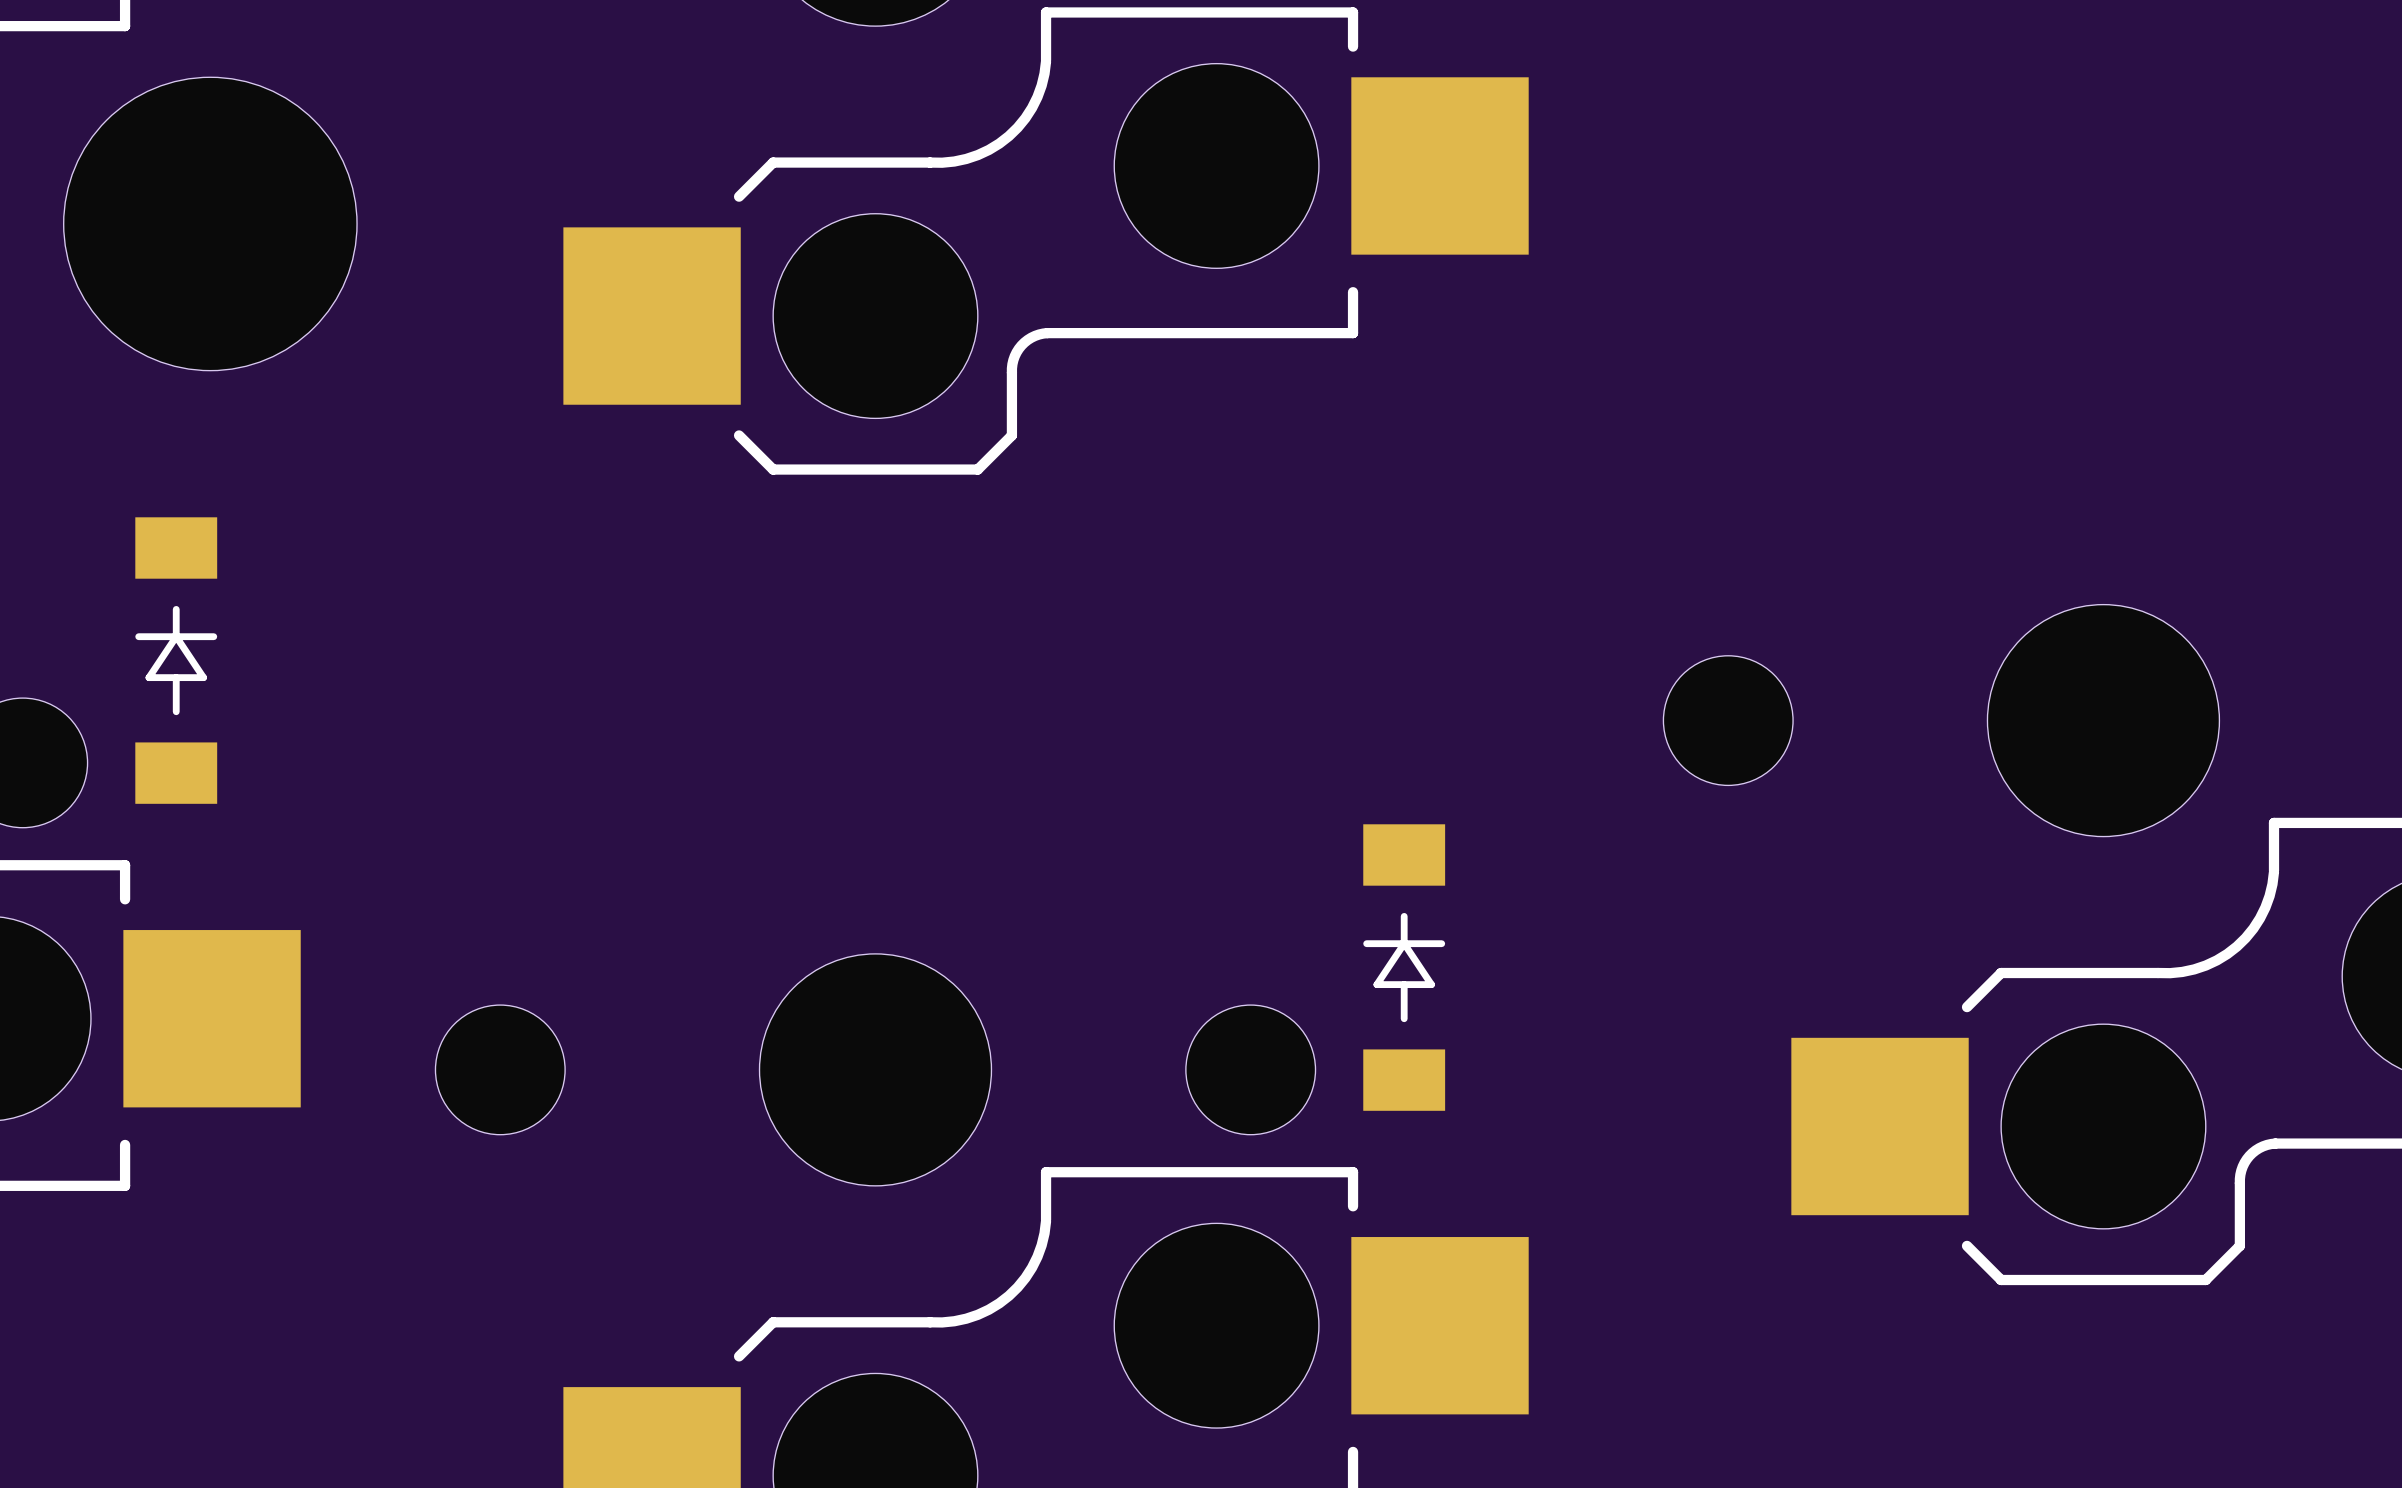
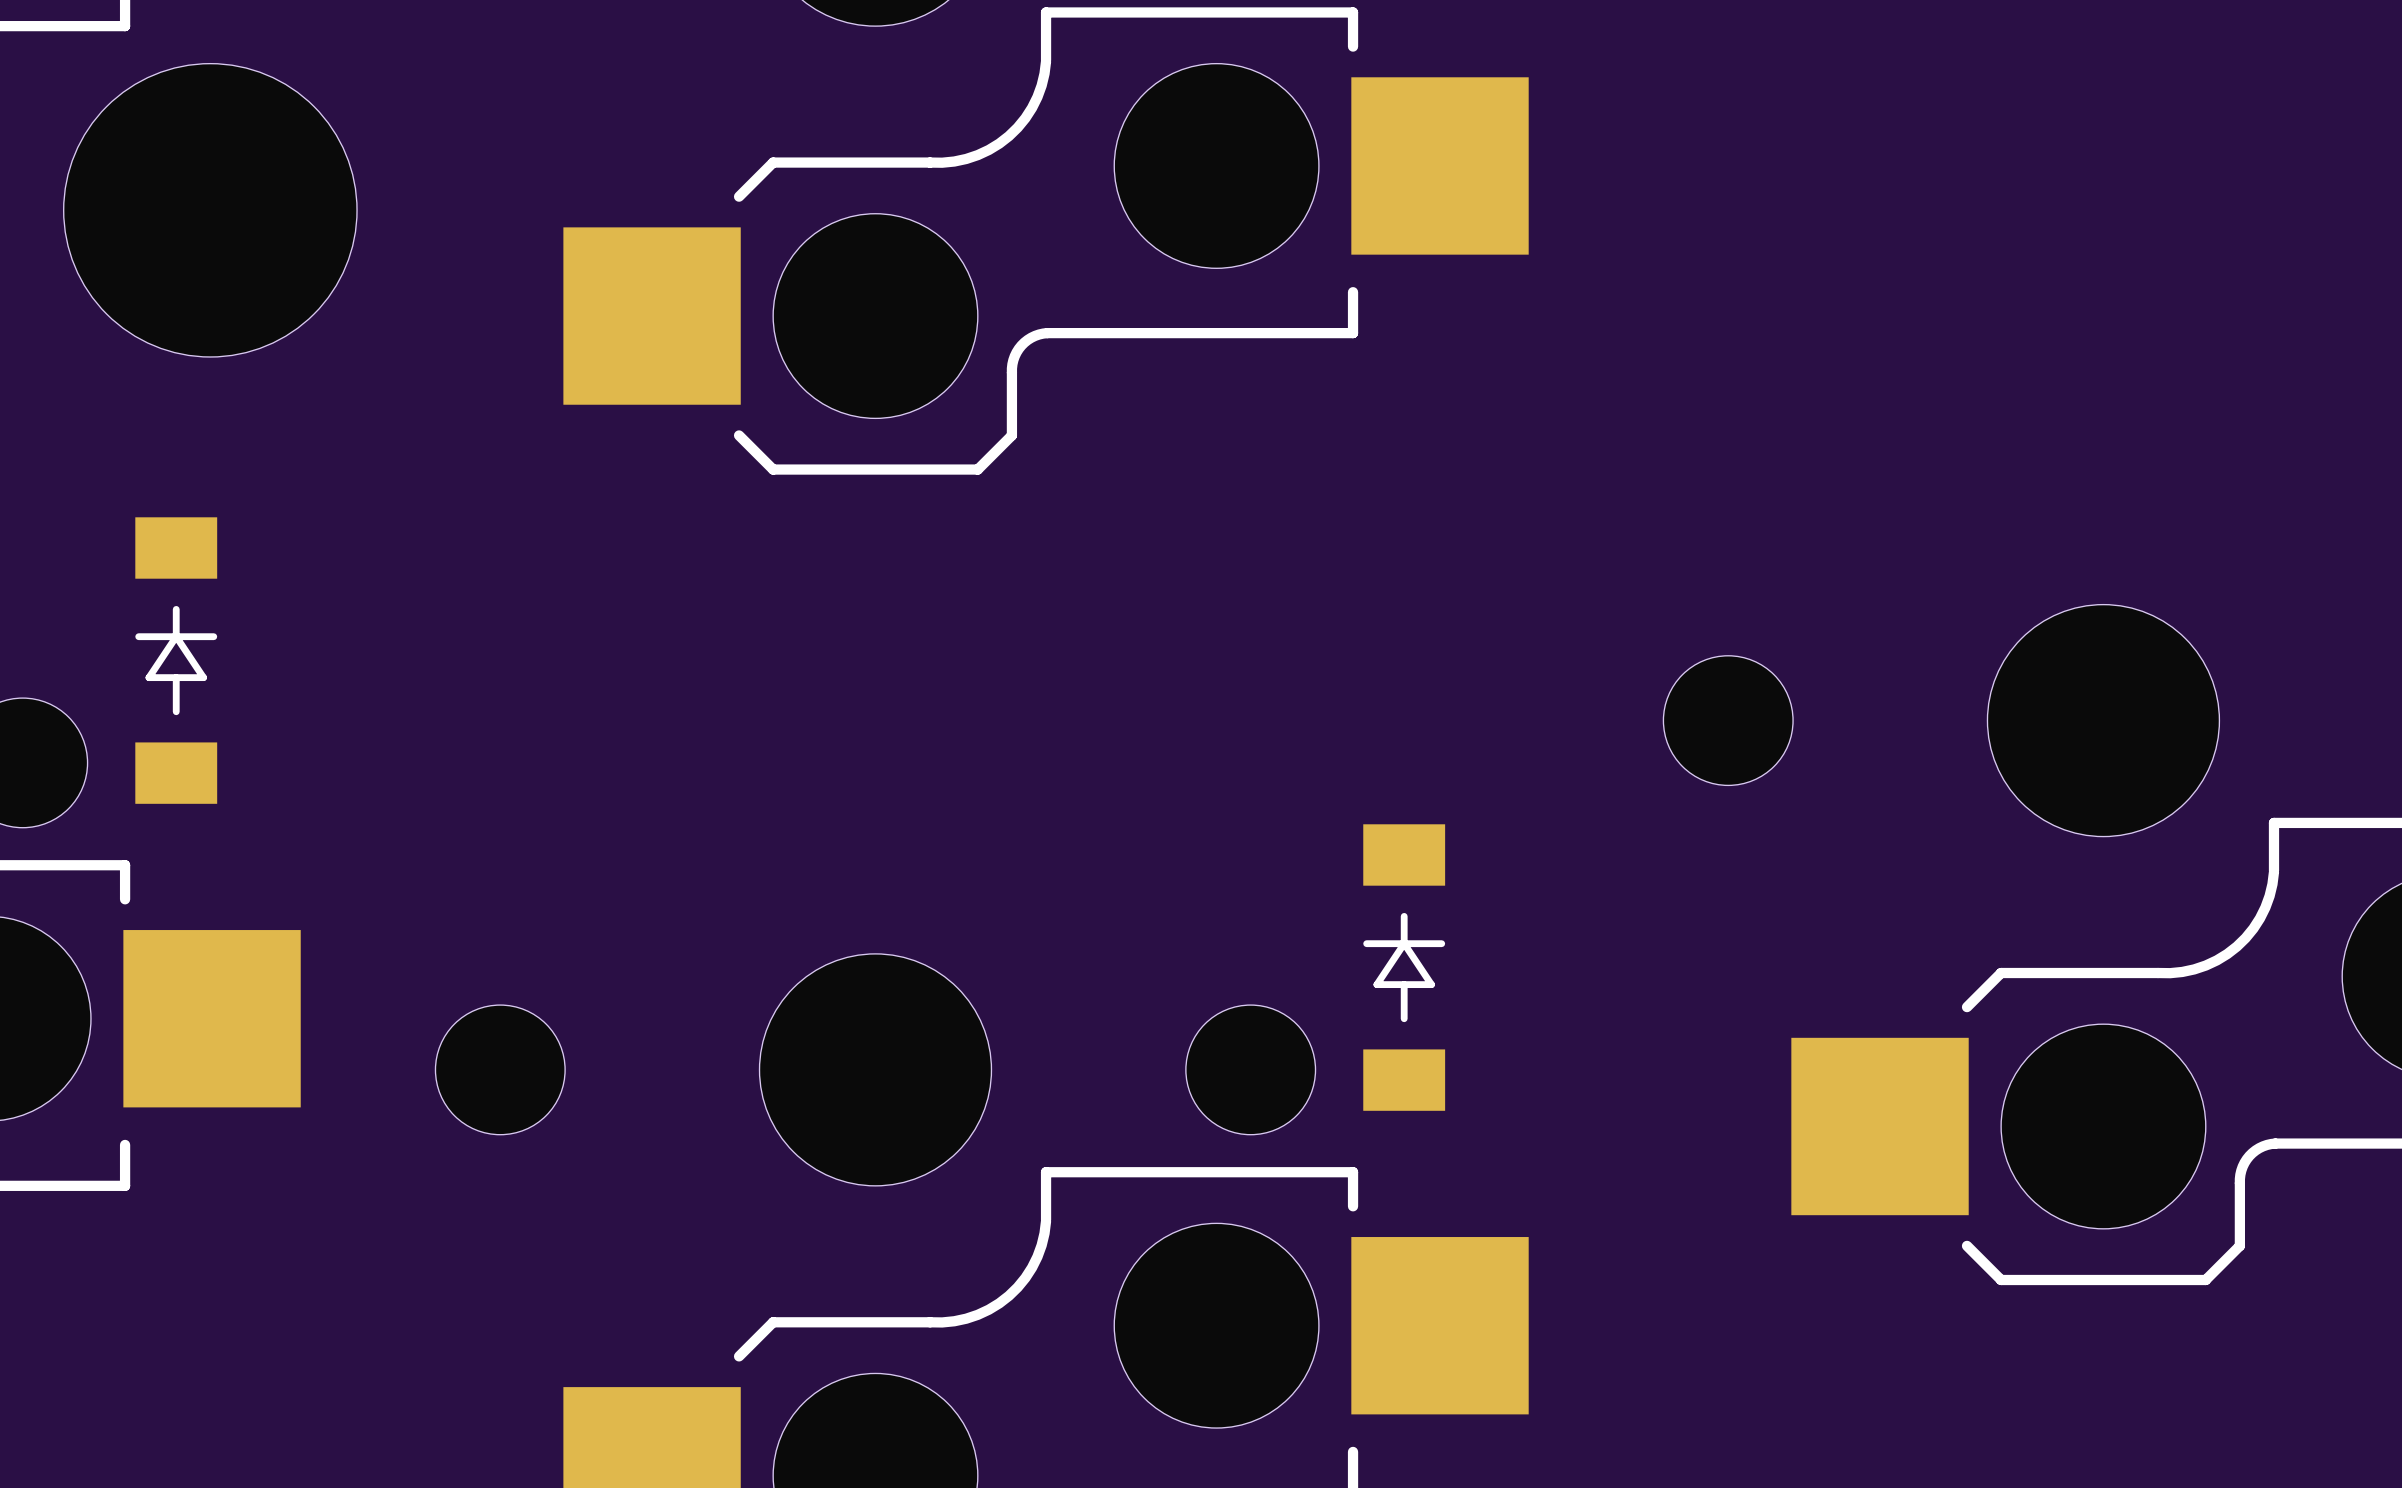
part position: (210, 223) -> (210, 210)

